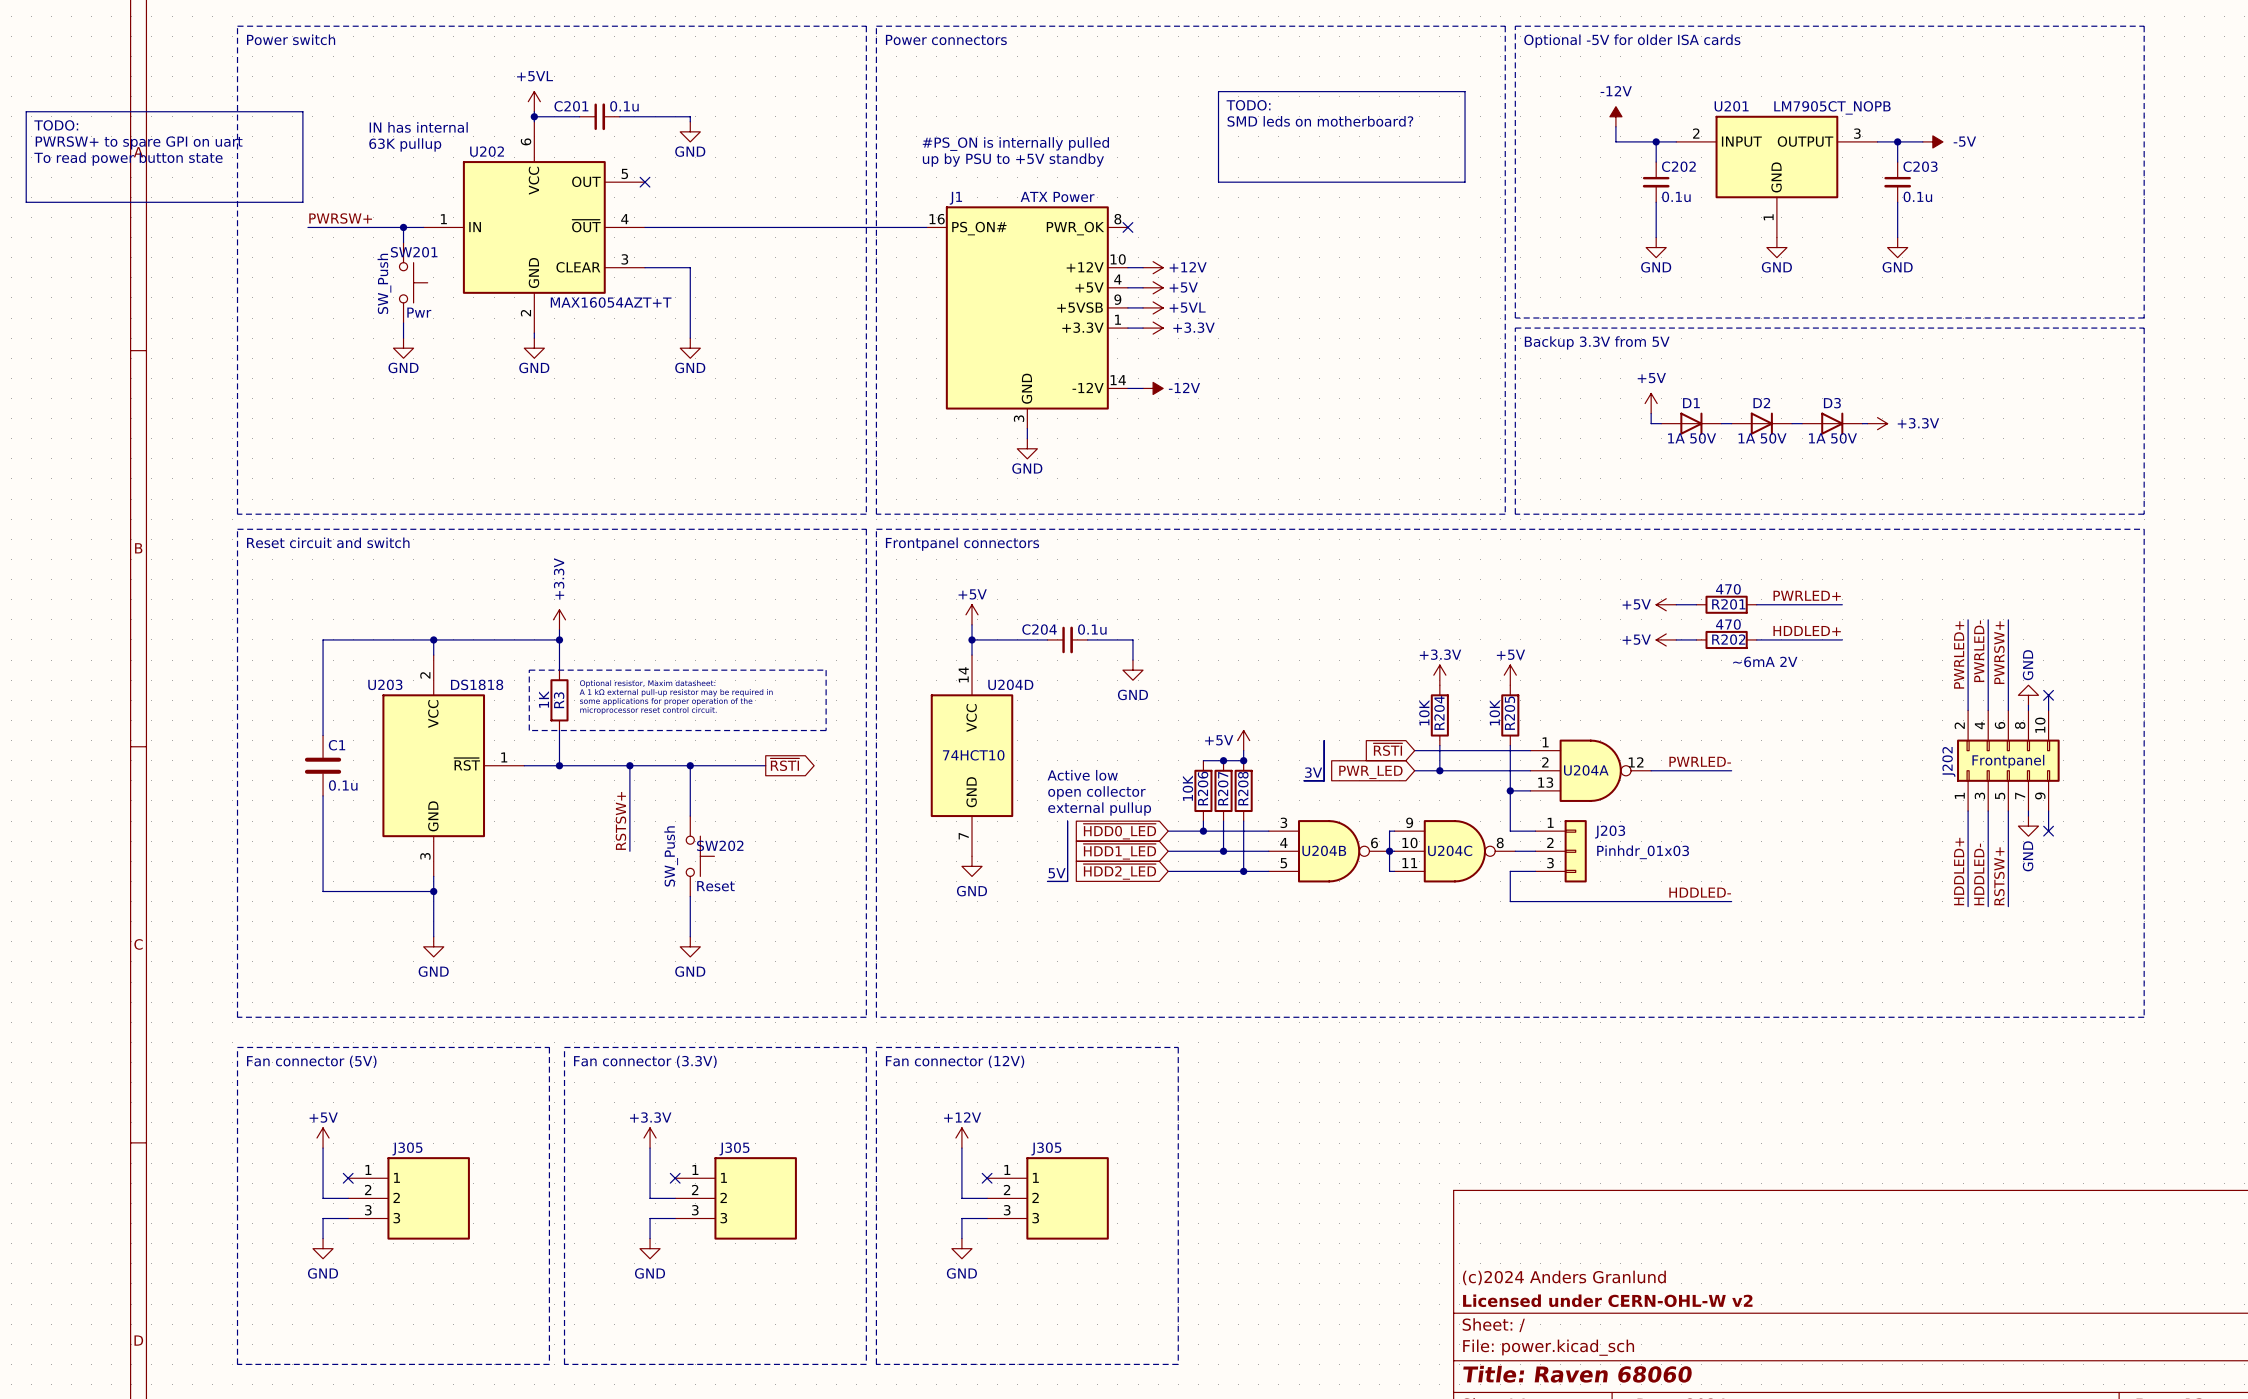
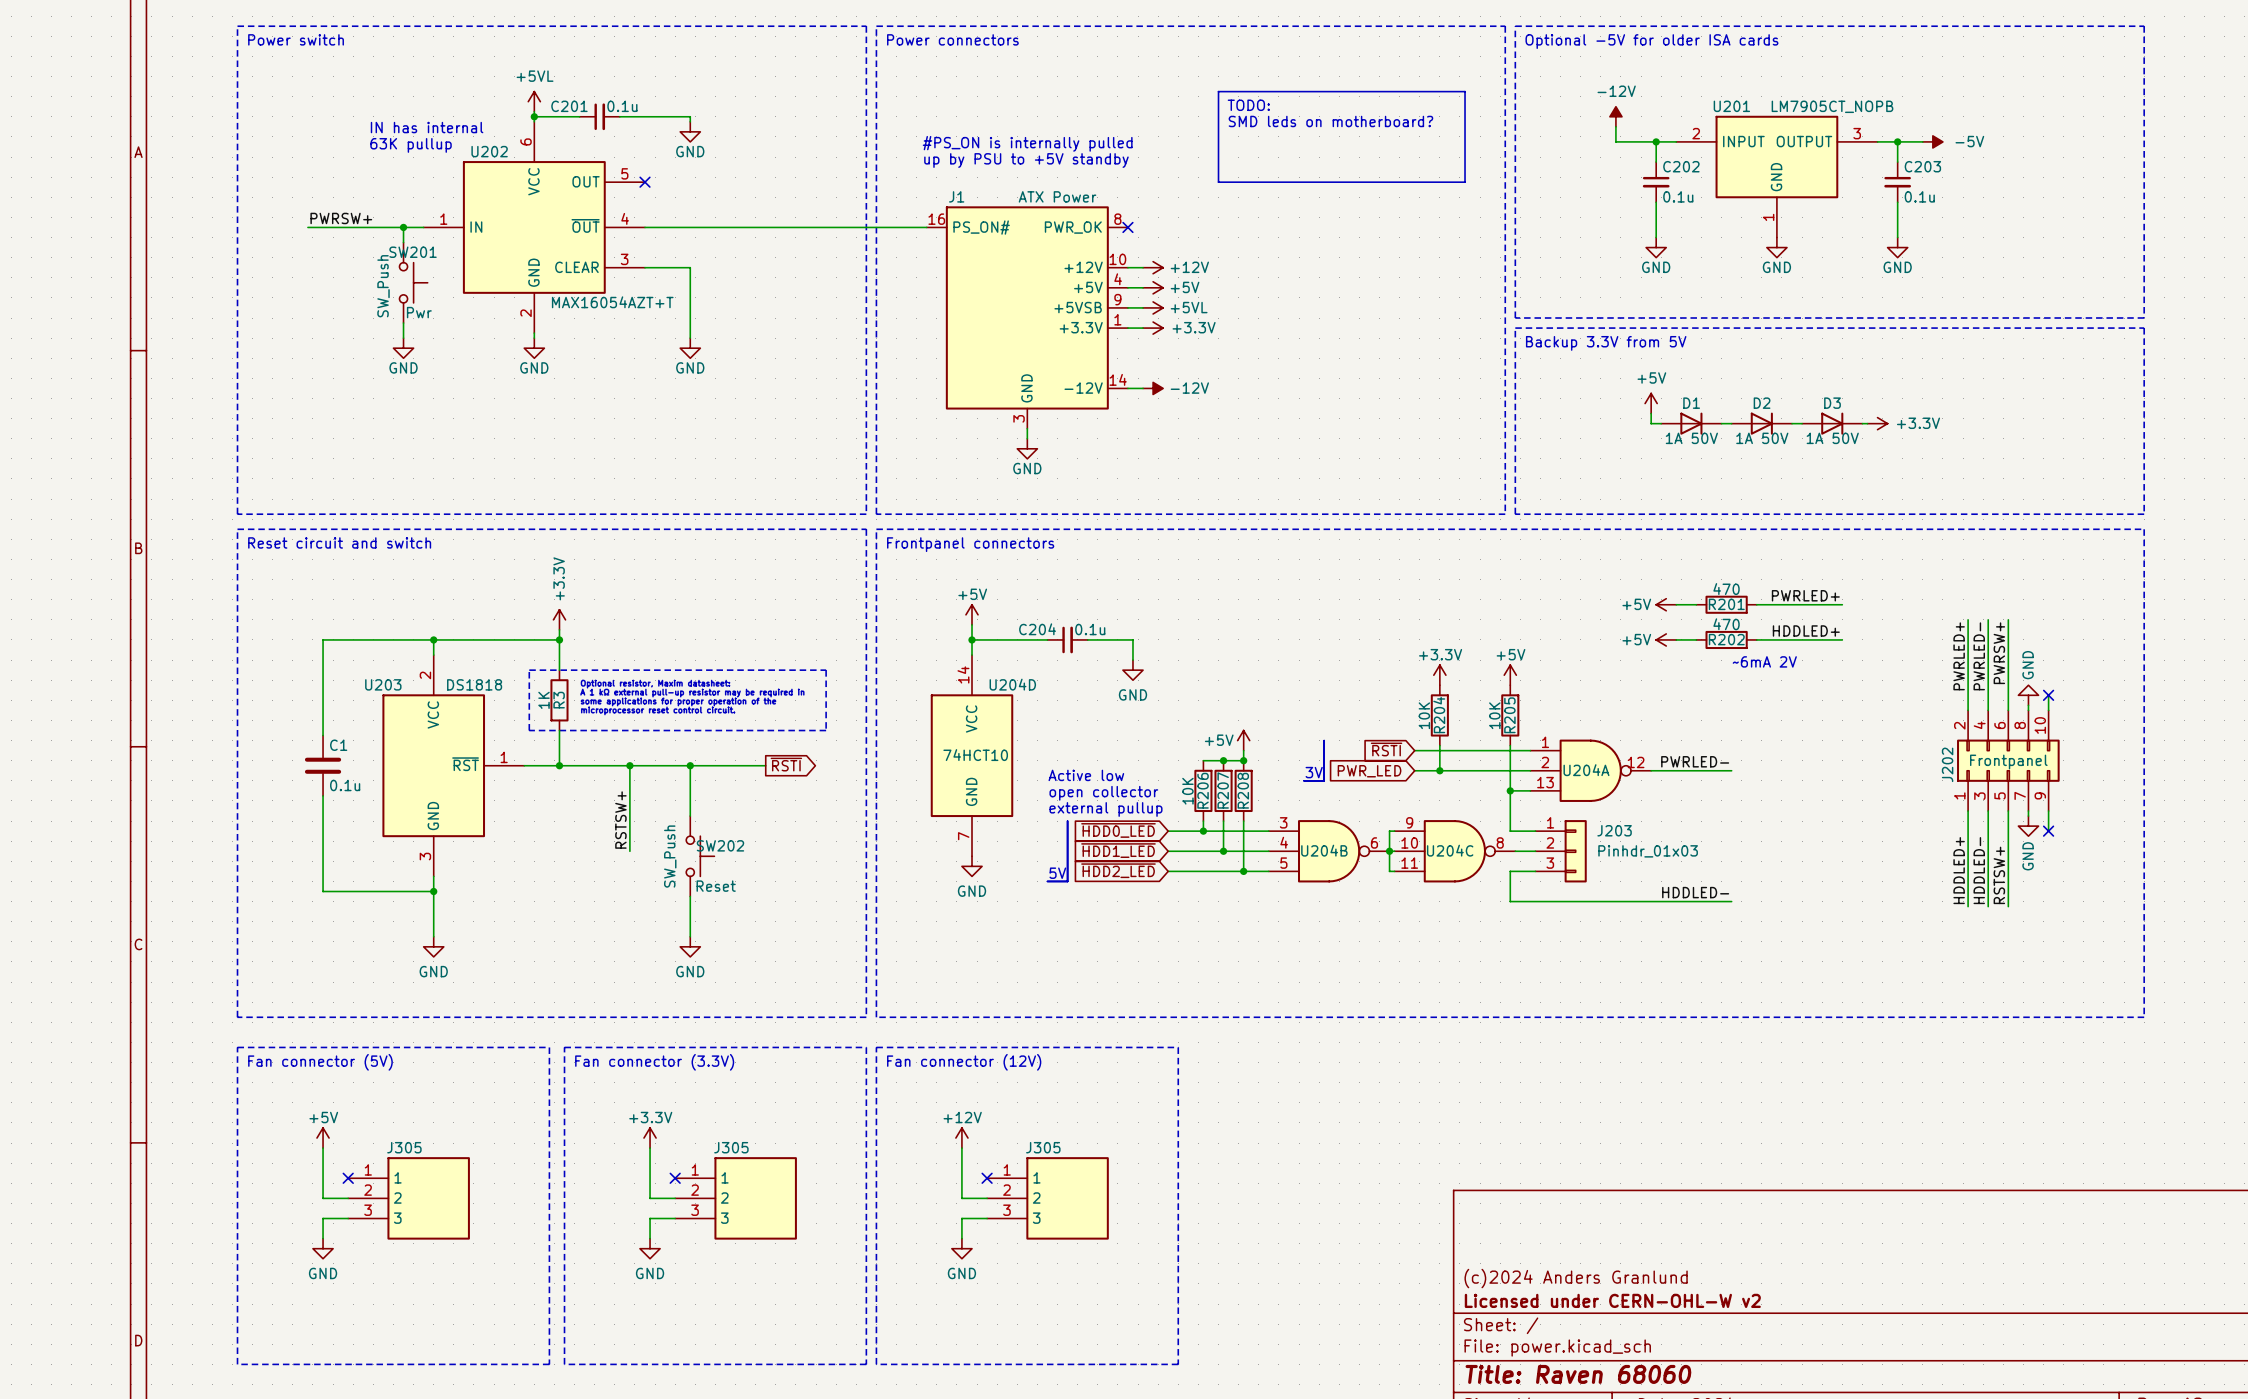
line: (26, 111) (302, 111) (302, 202) (26, 202) (26, 111) -> none
text: TODO: (56, 125) -> none
text: PWRSW+ to spare GPI on uart (139, 142) -> none
text: To read power button state (128, 159) -> none

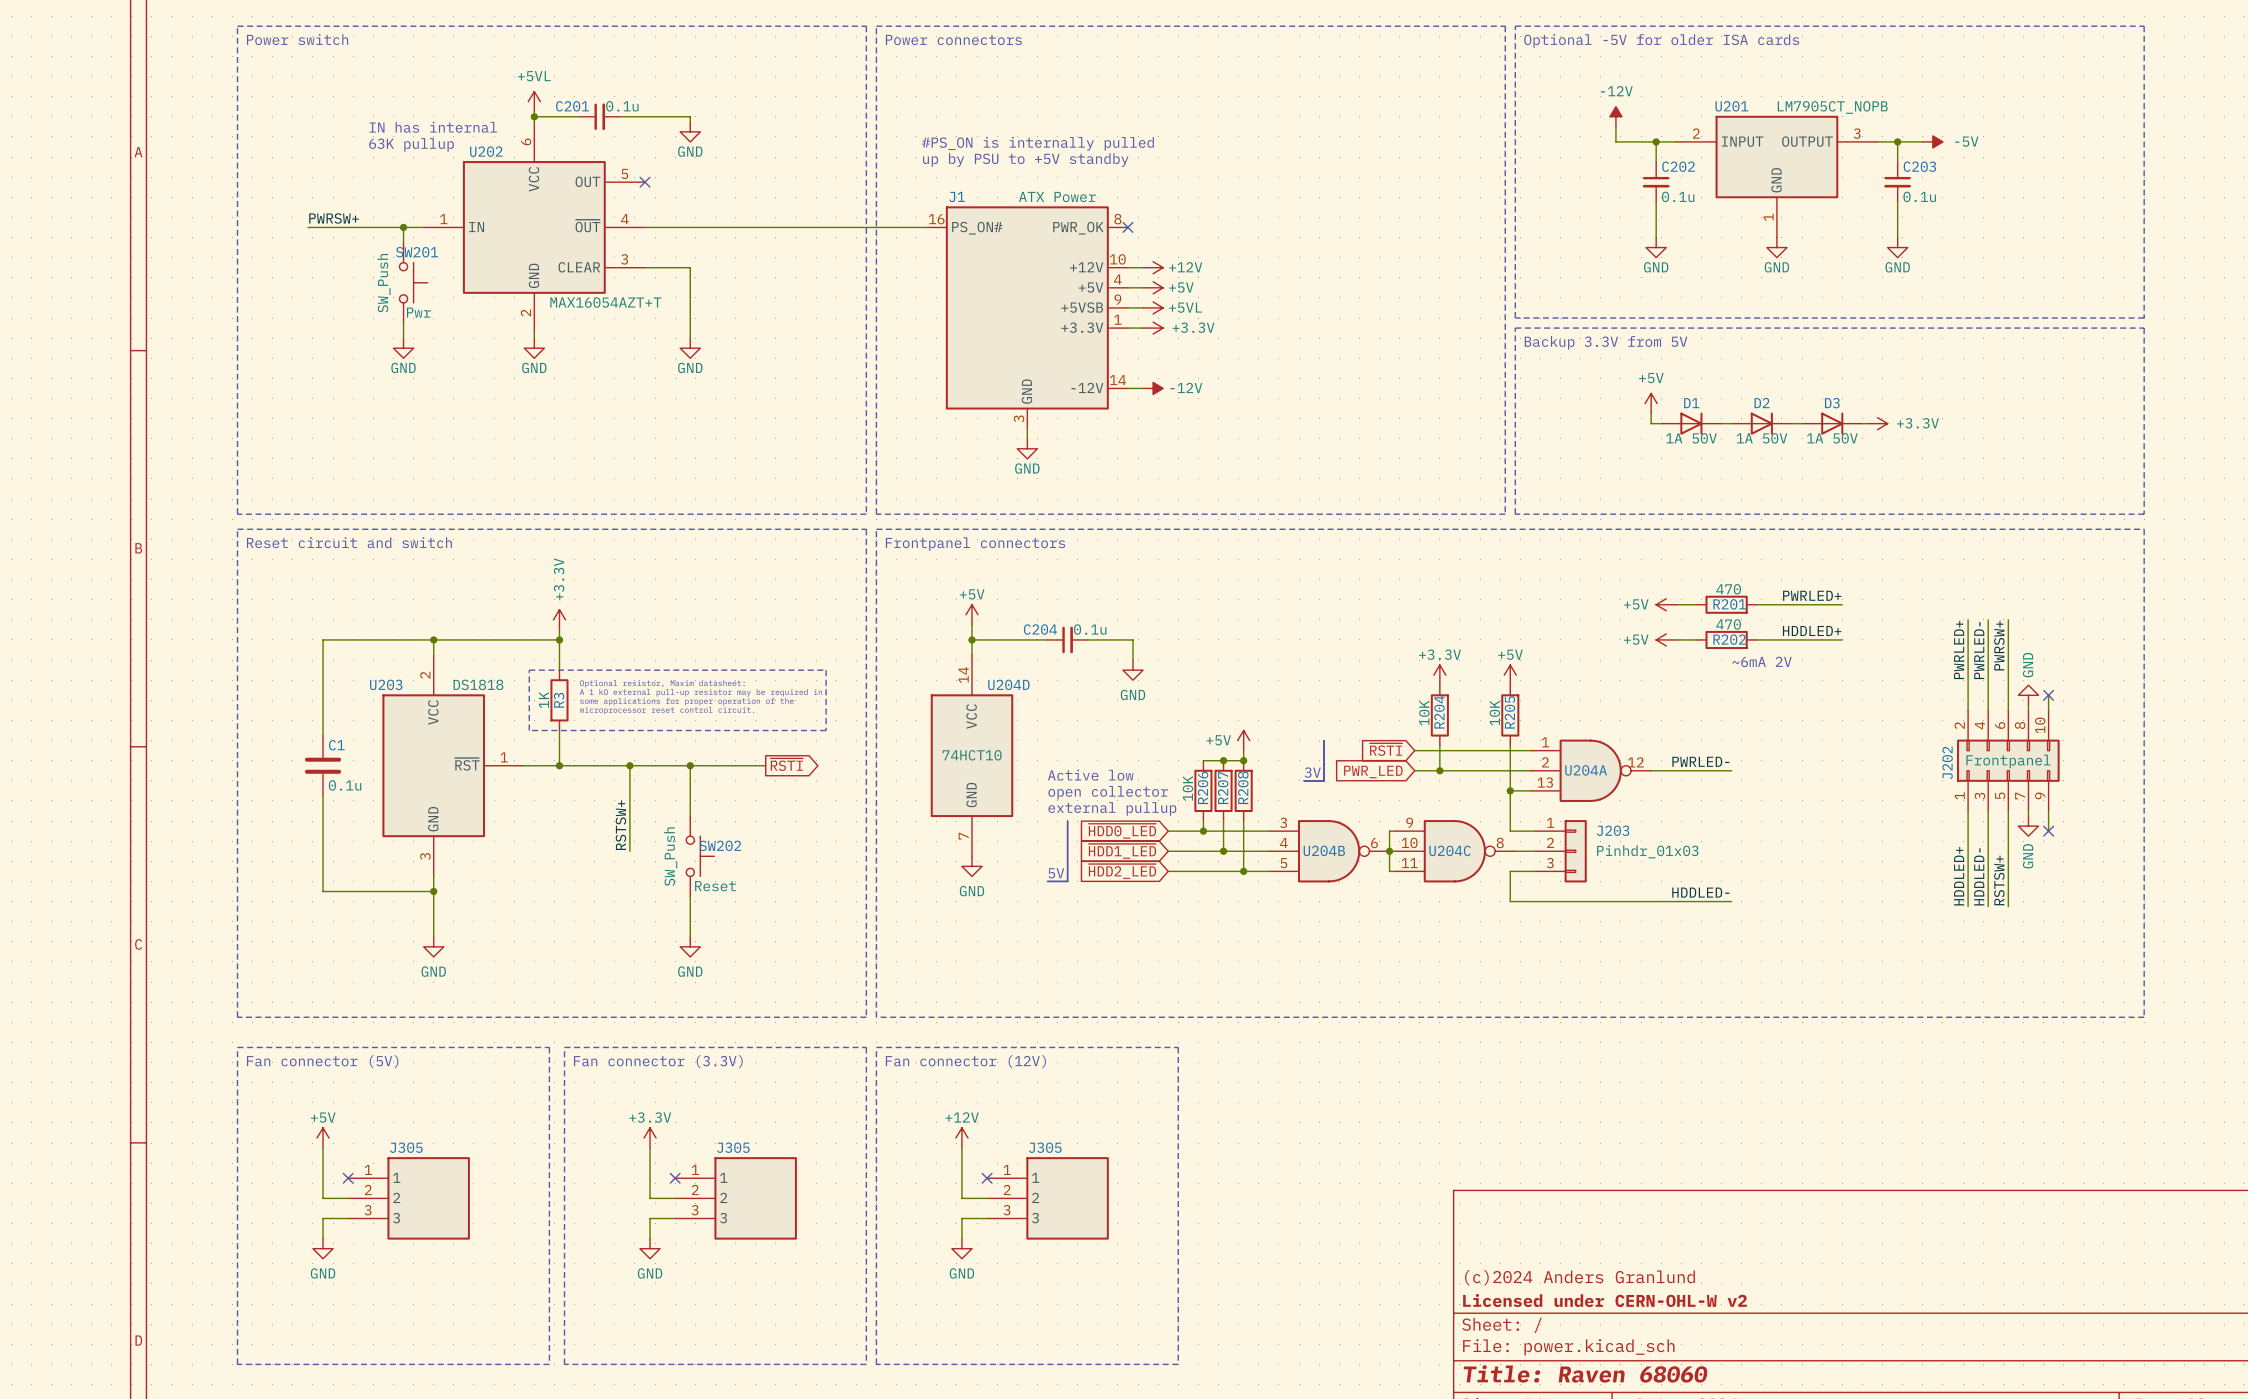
line: (1218, 91) (1465, 91) (1465, 182) (1218, 182) (1218, 91) -> none
text: TODO: (1248, 105) -> none
text: SMD leds on motherboard? (1330, 121) -> none

